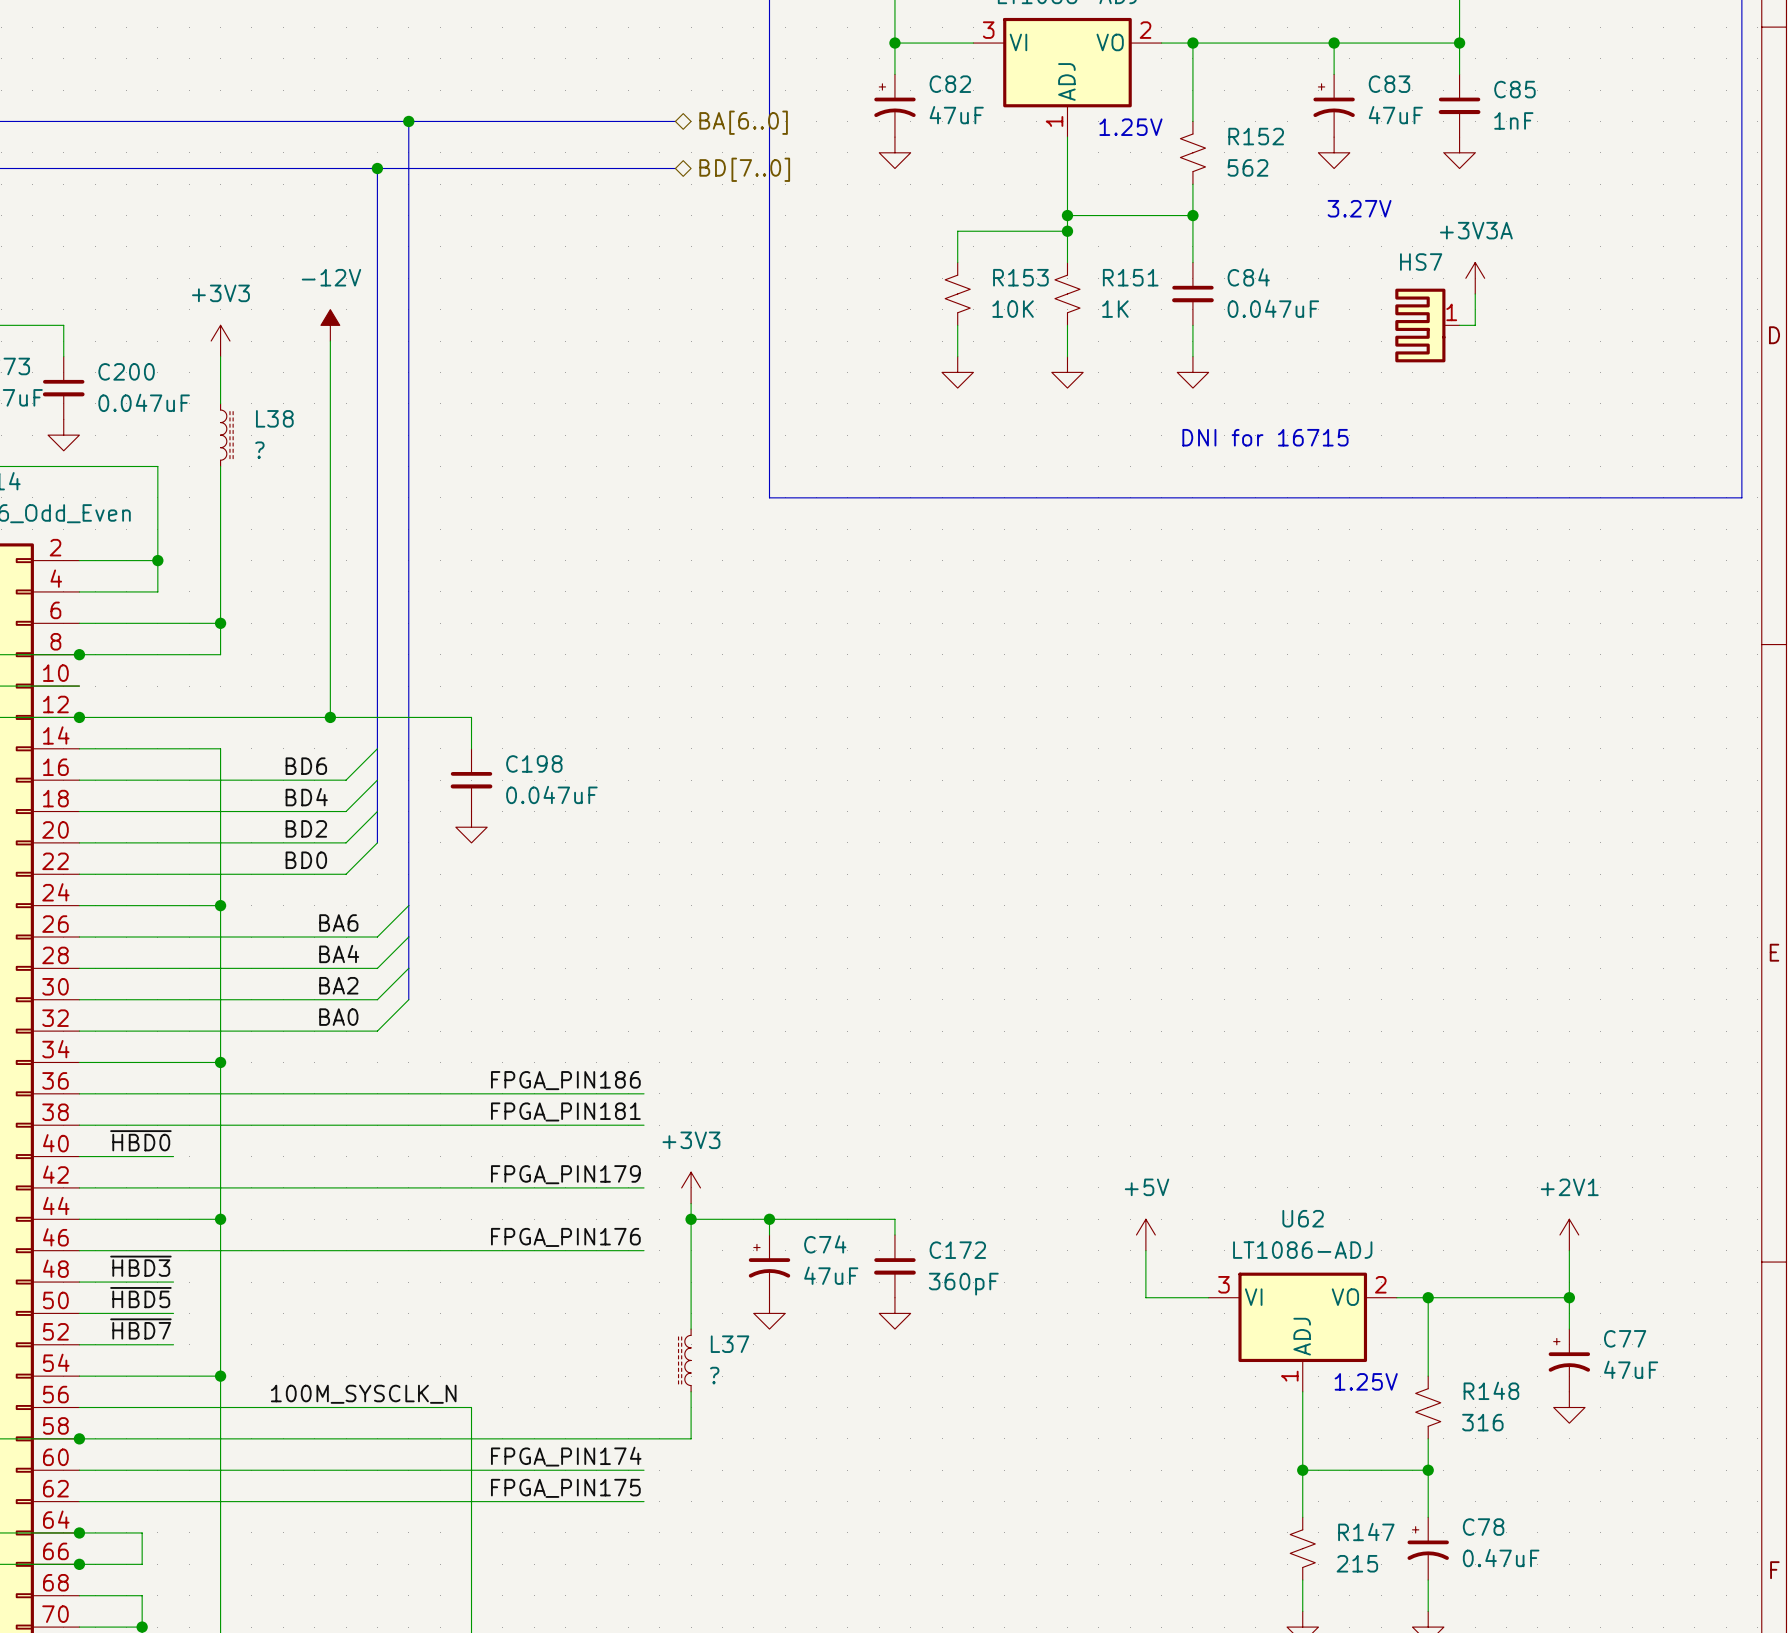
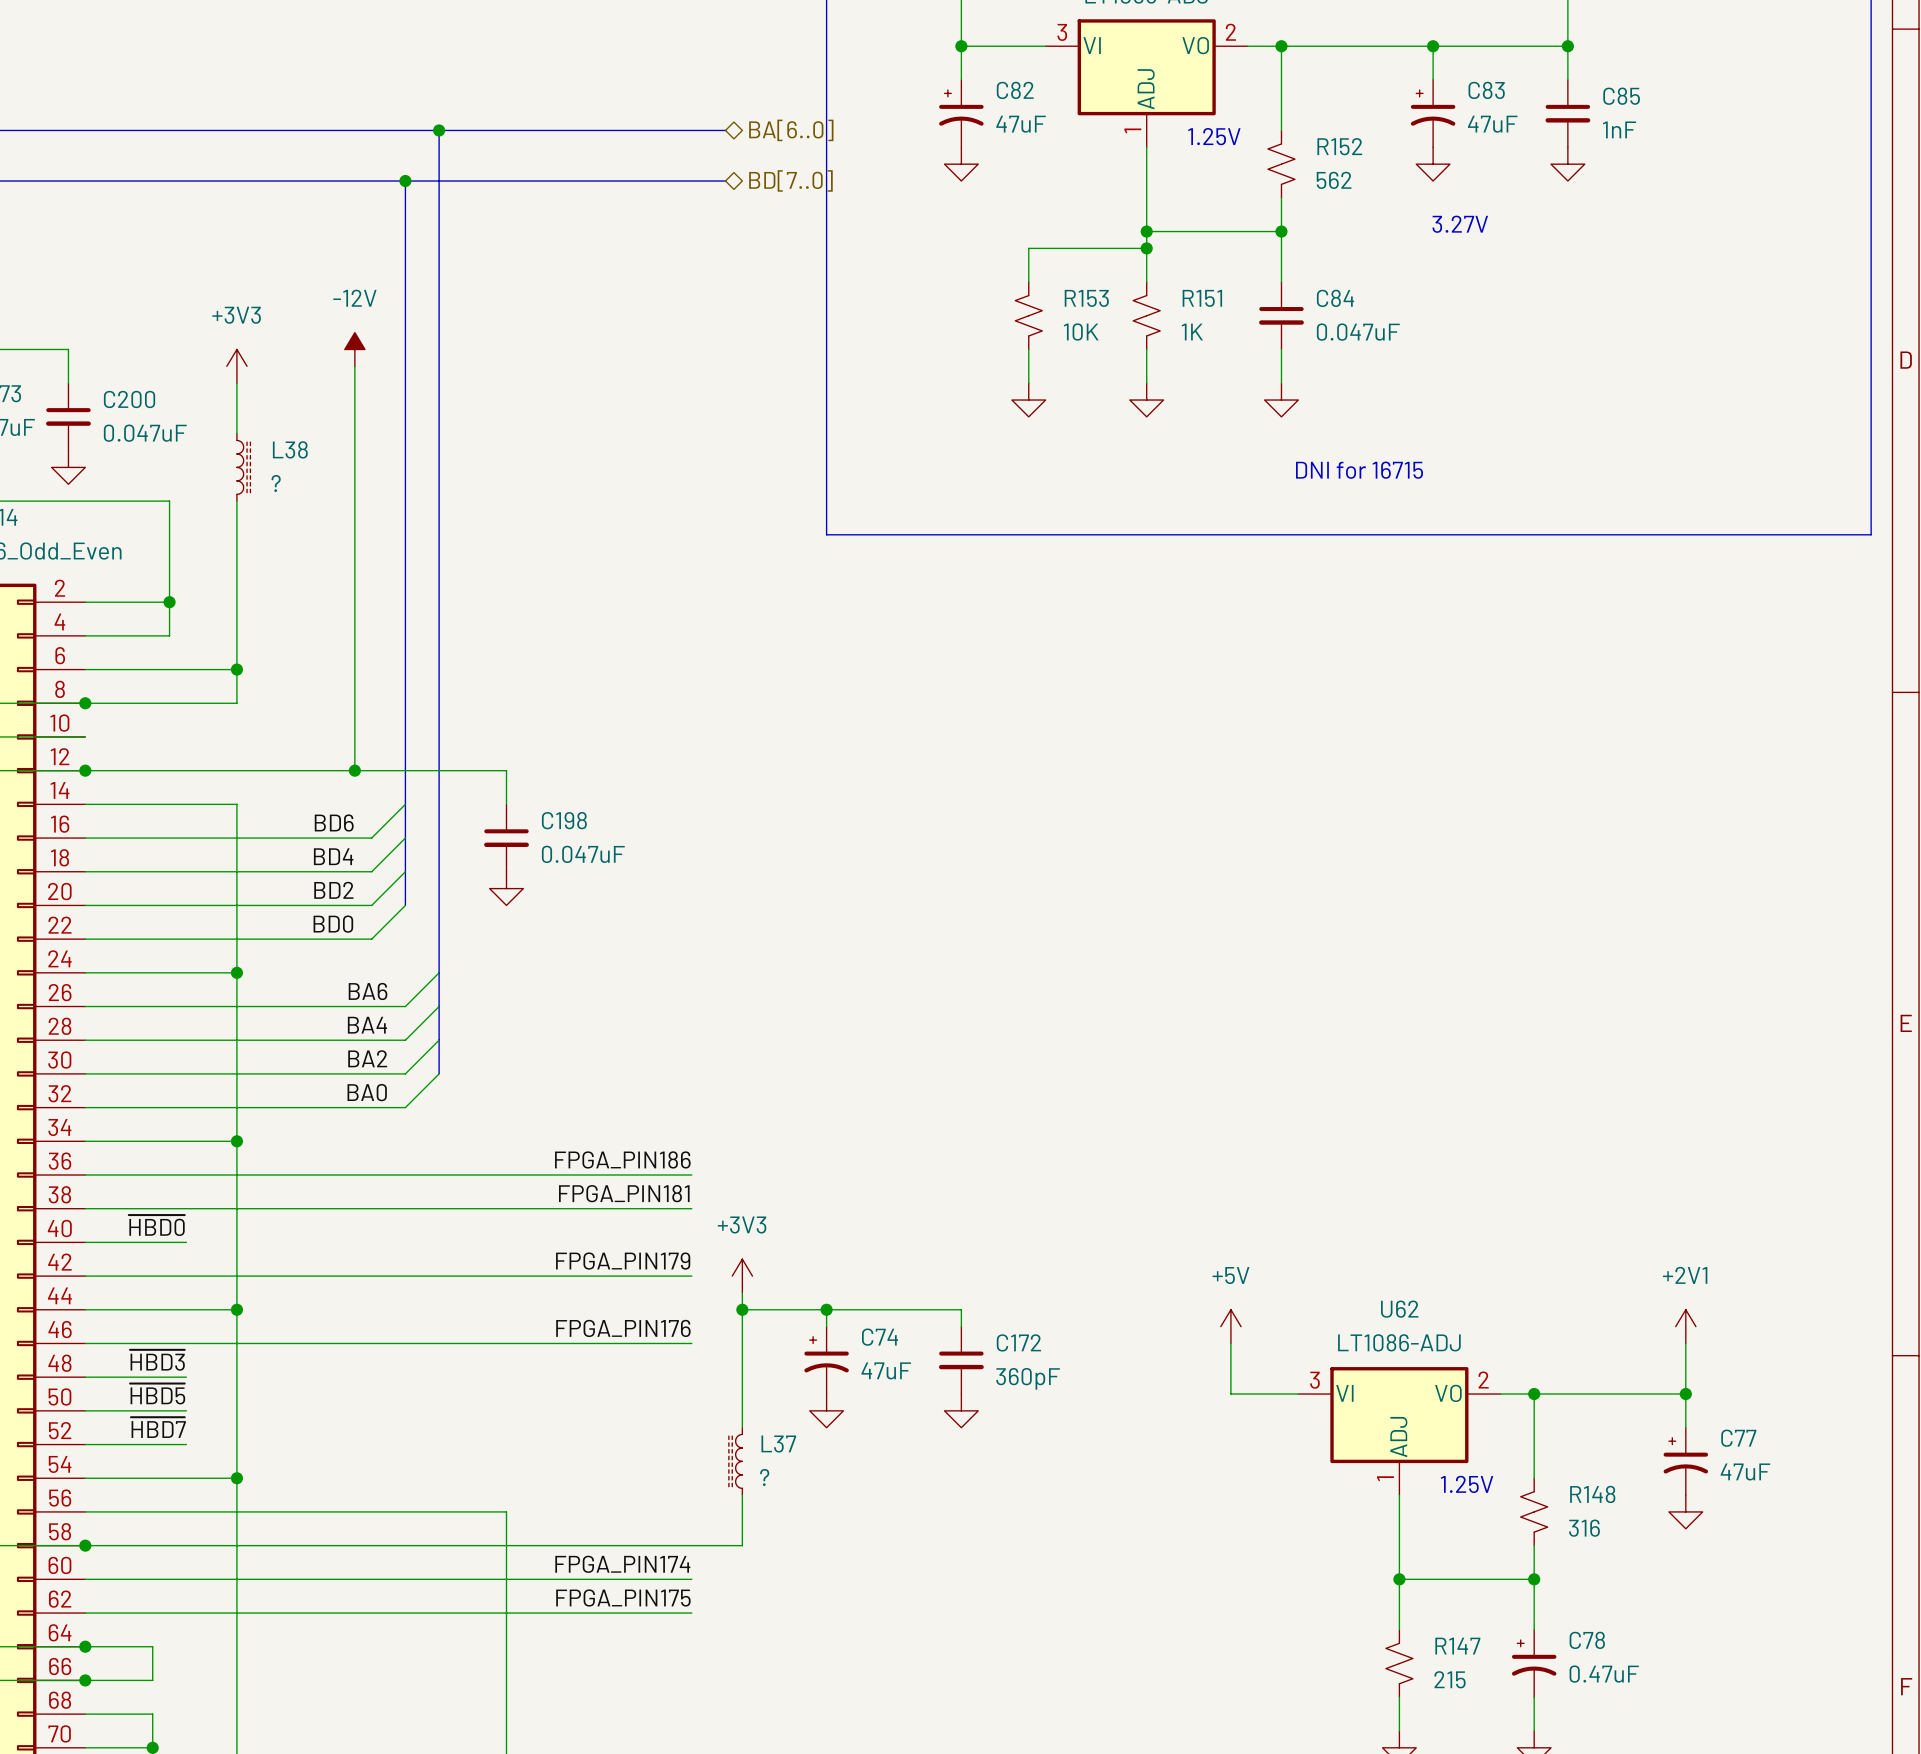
power symbol: +3V3A (1475, 278) -> none
wire: (1475, 293) (1475, 325) (1459, 325) -> none
HS7: (1427, 325) -> none
label: 100M_SYSCLK_N (363, 1394) -> none

